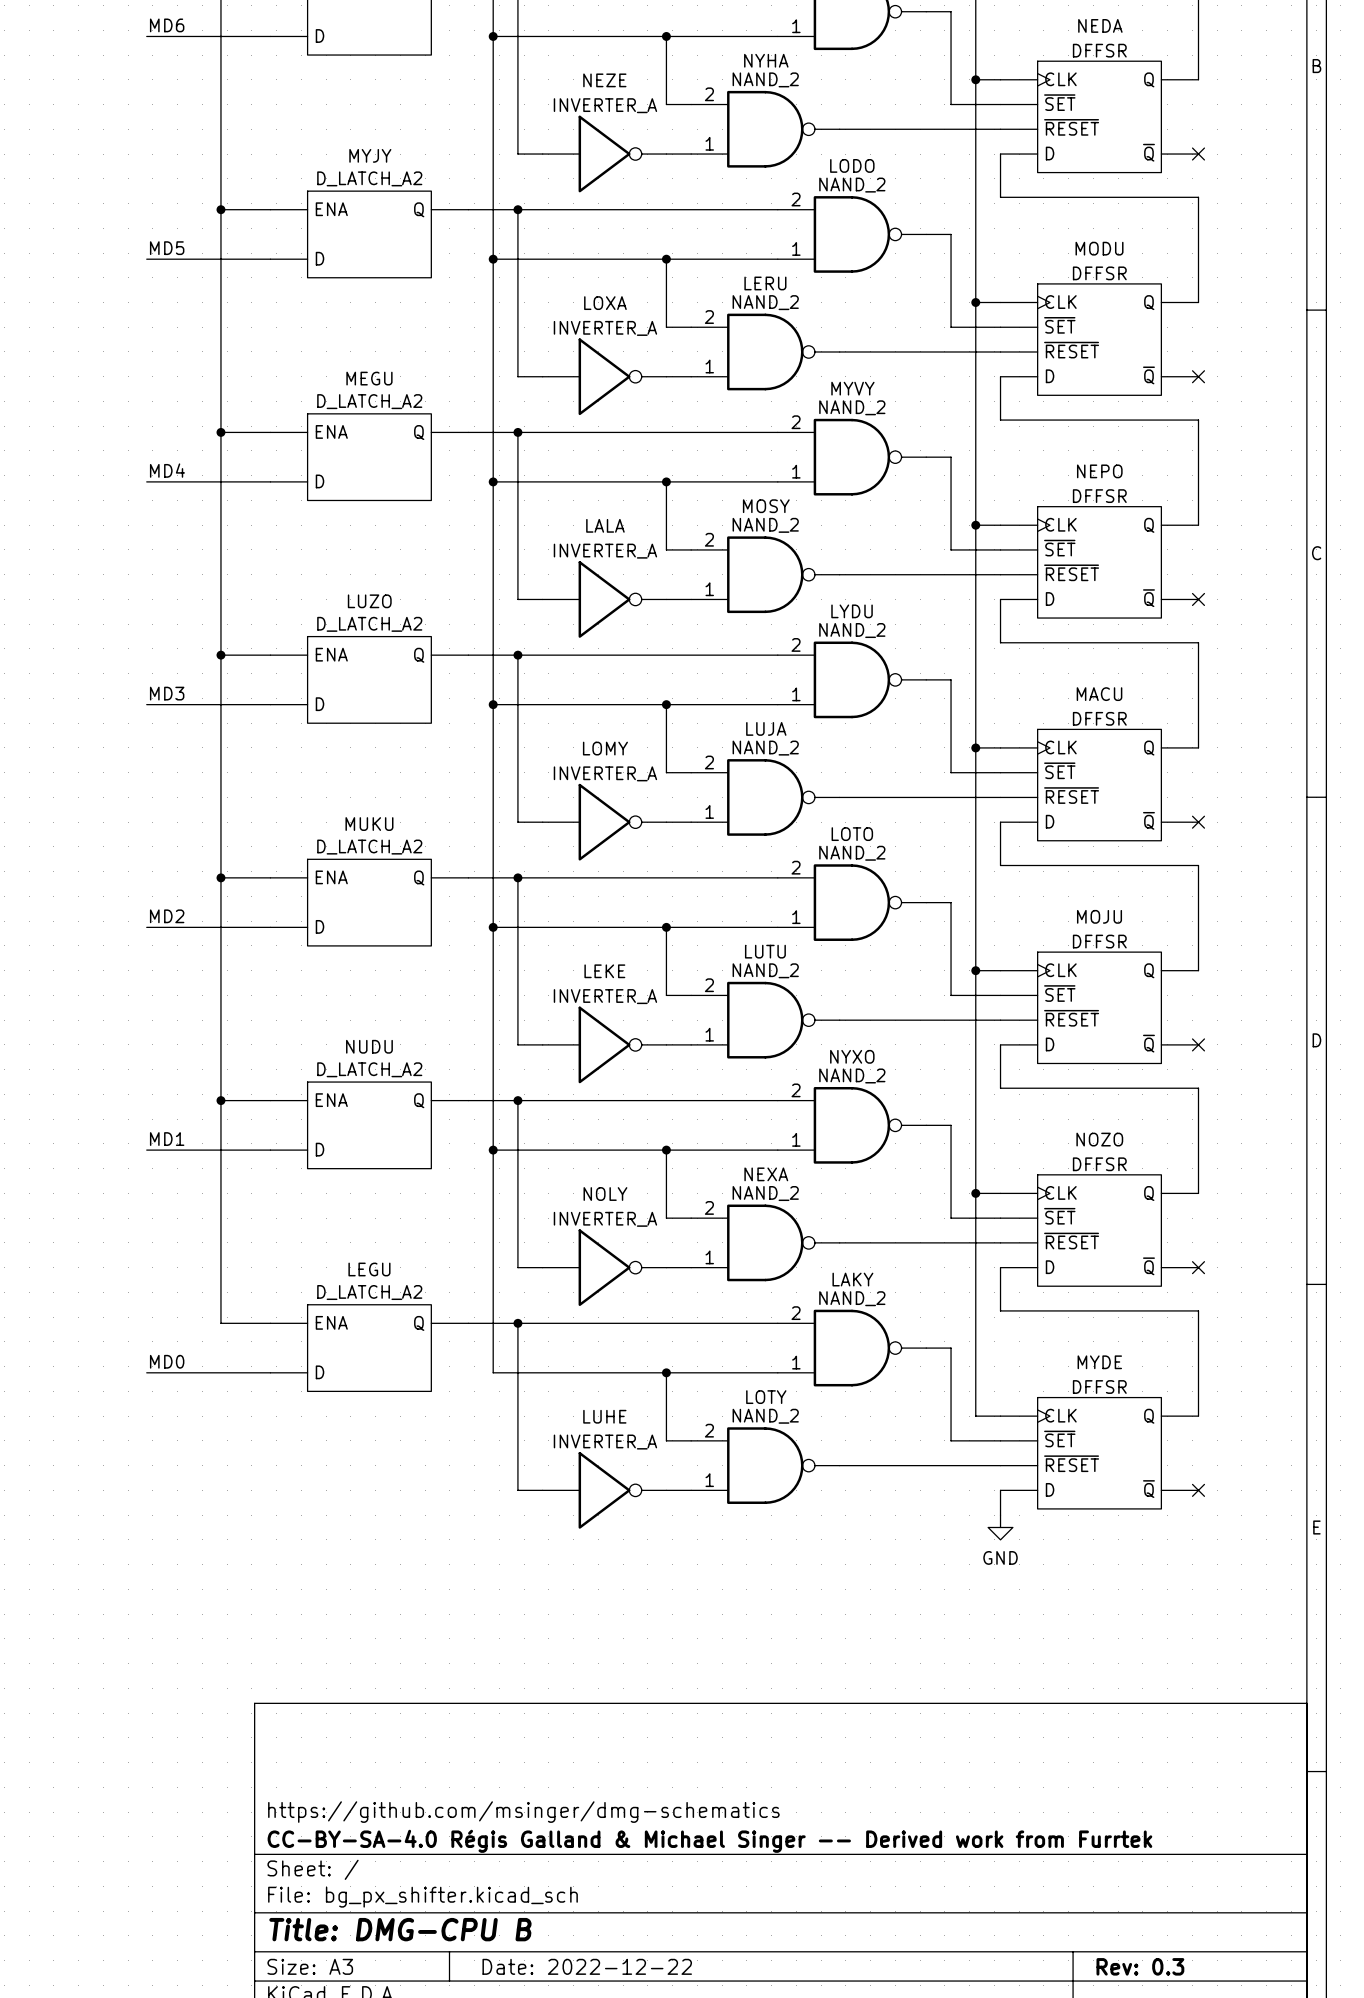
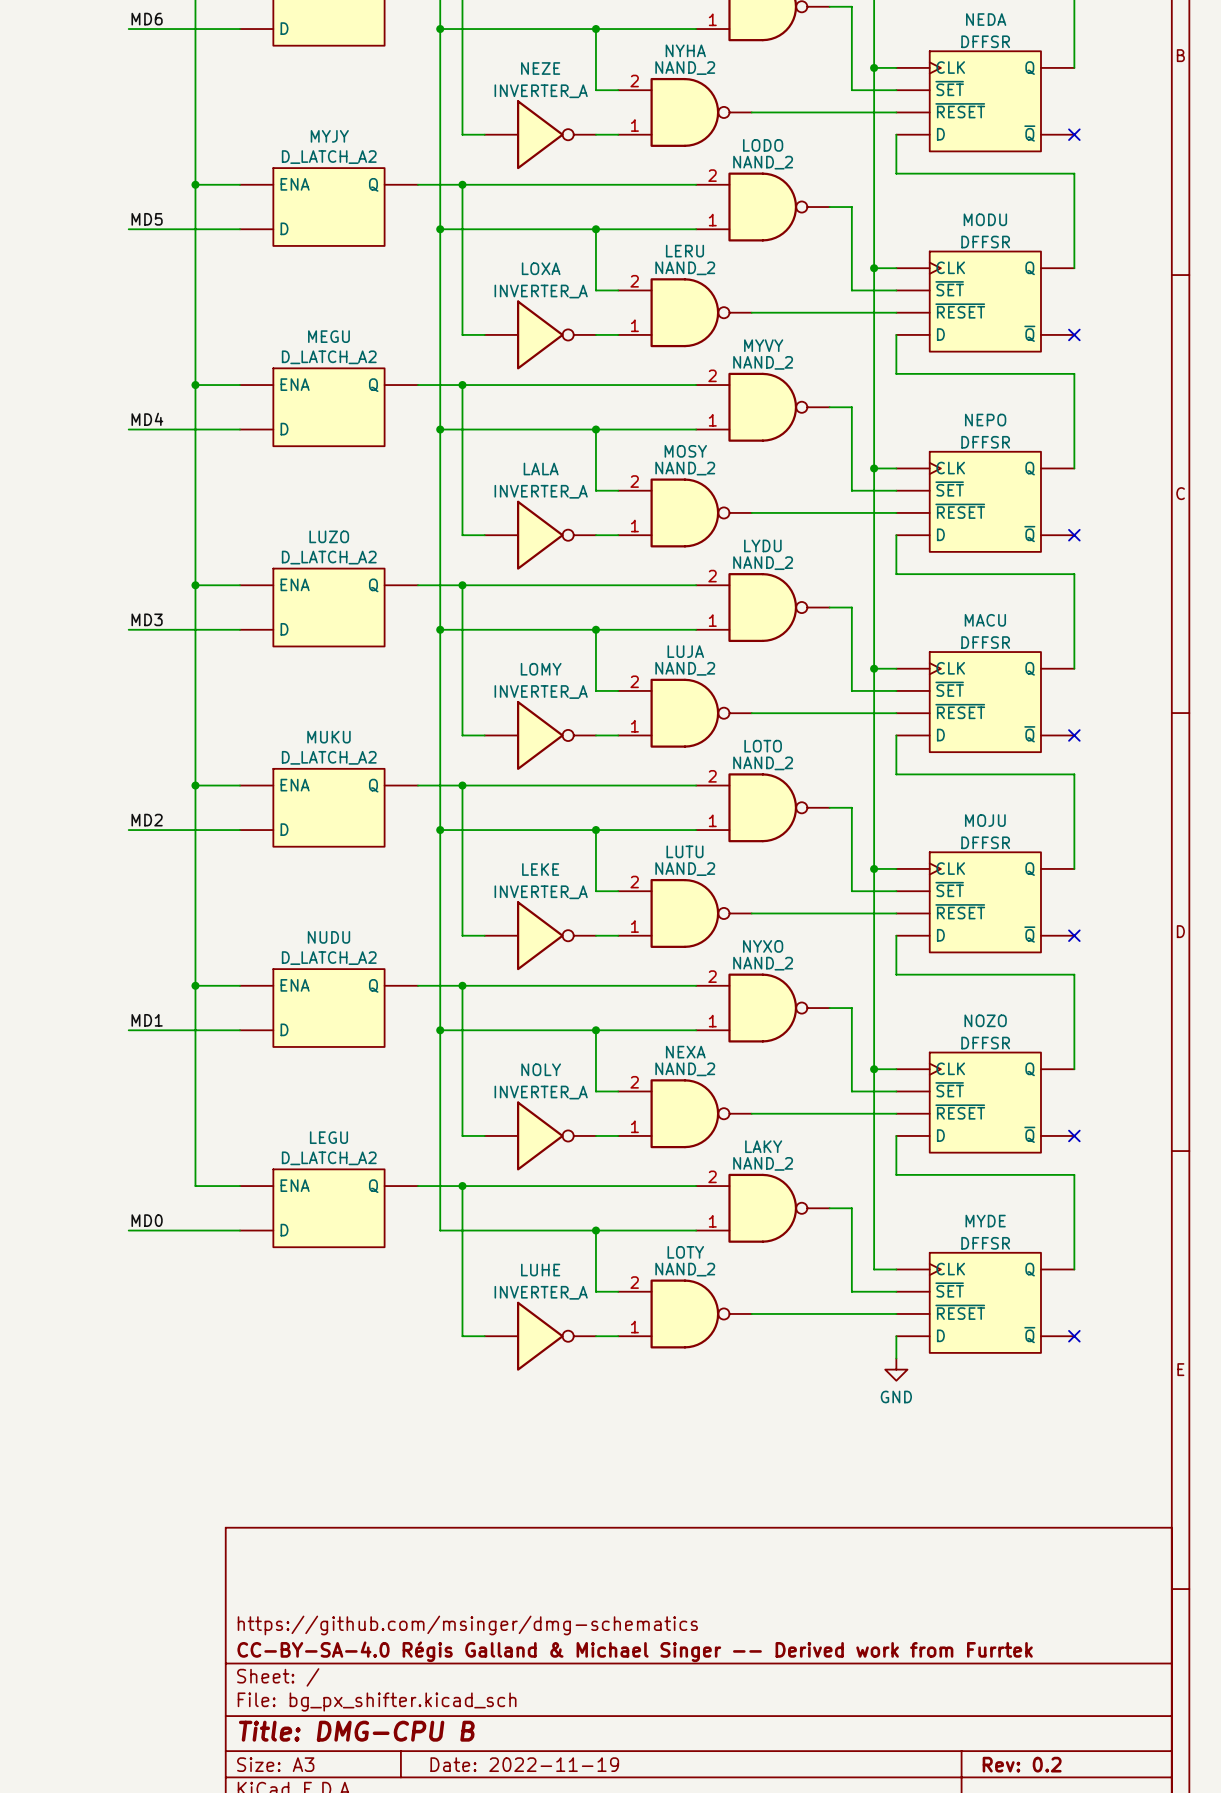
title block: Date: 2022-12-22 (587, 1966) -> Date: 2022-11-19 (524, 1764)
title block: Rev: 0.3 (1140, 1966) -> Rev: 0.2 (1022, 1764)

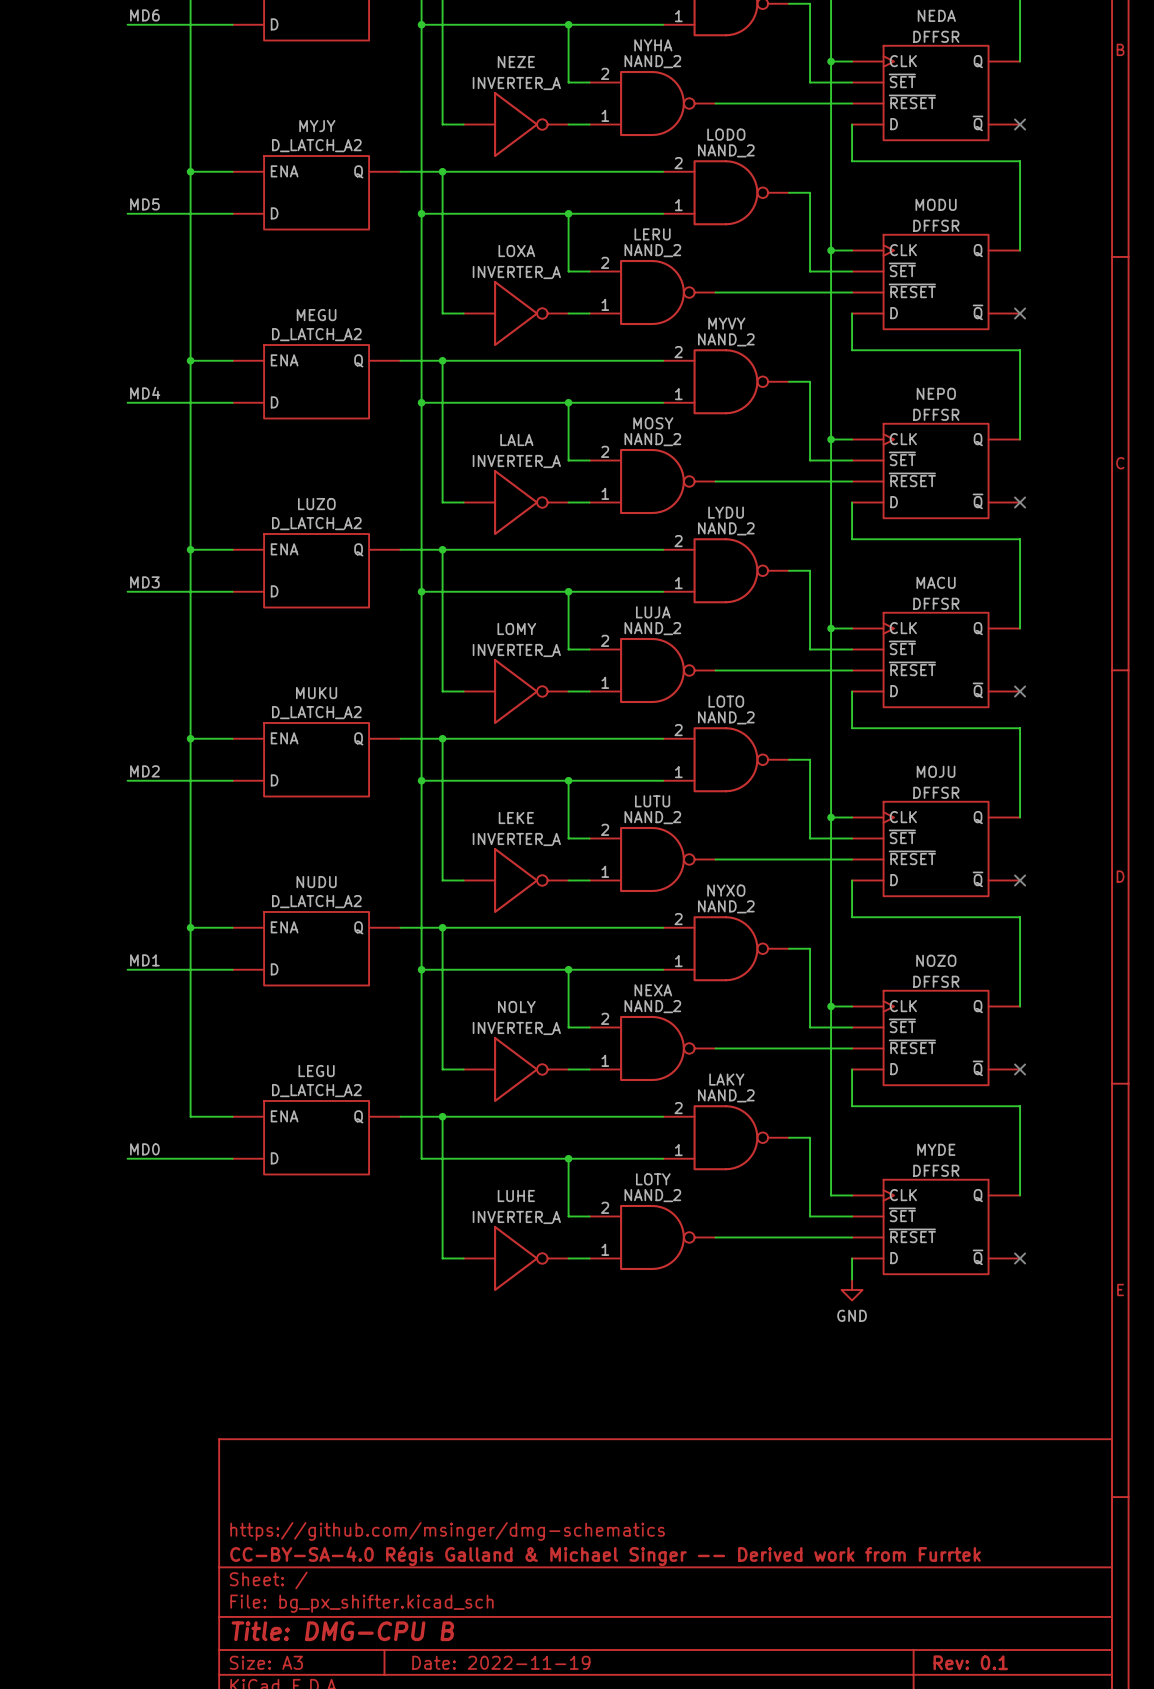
title block: Rev: 0.2 (1022, 1764) -> Rev: 0.1 (970, 1662)

